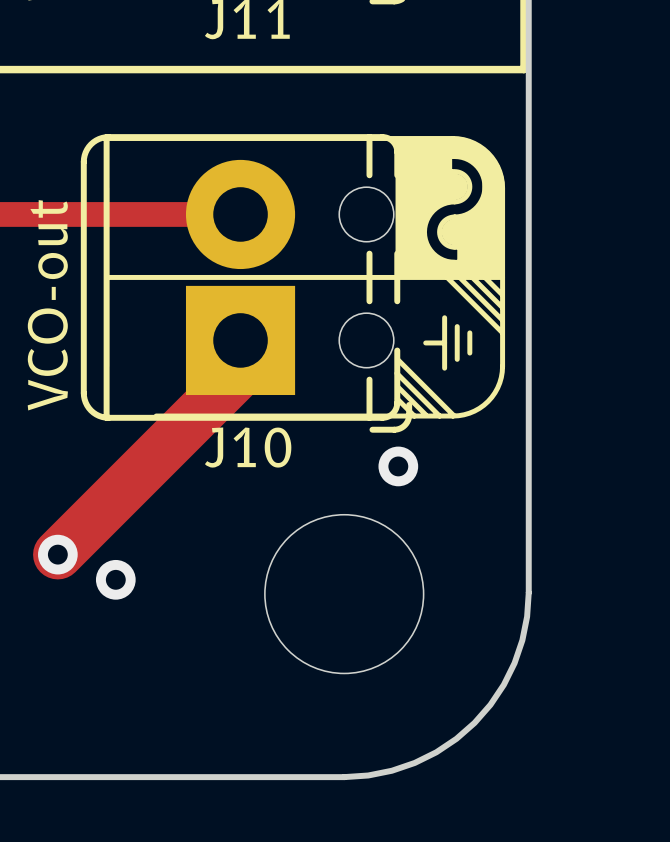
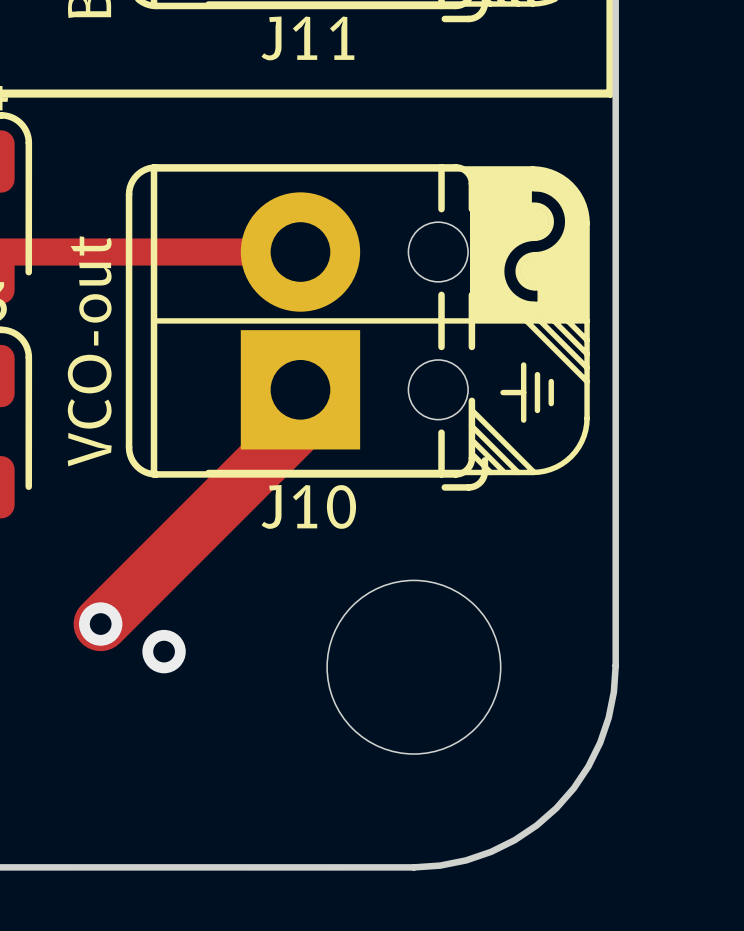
via: (398, 466) -> none

